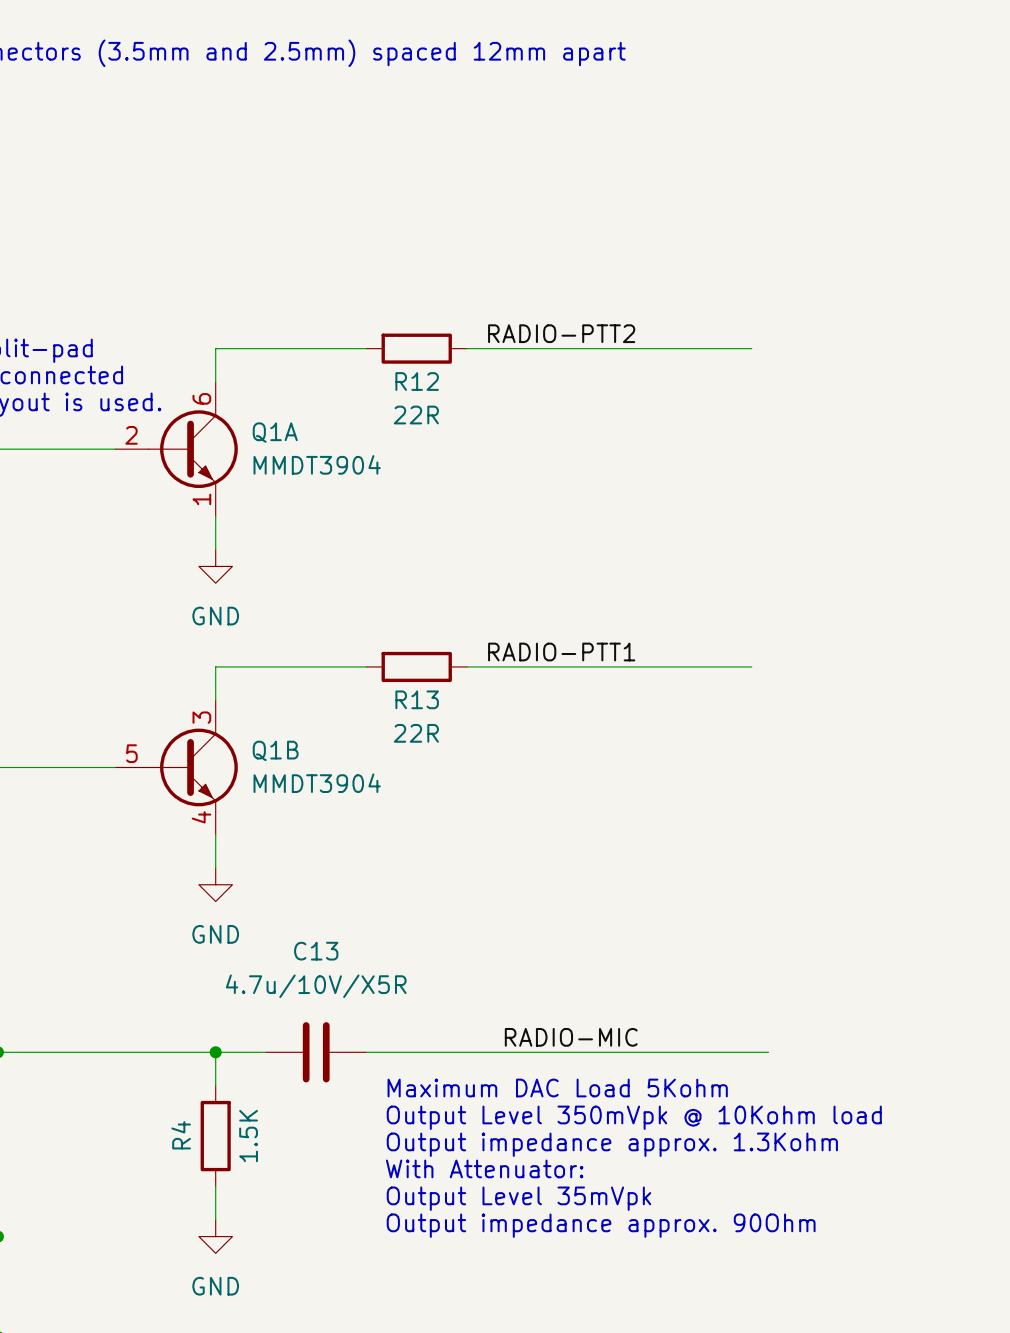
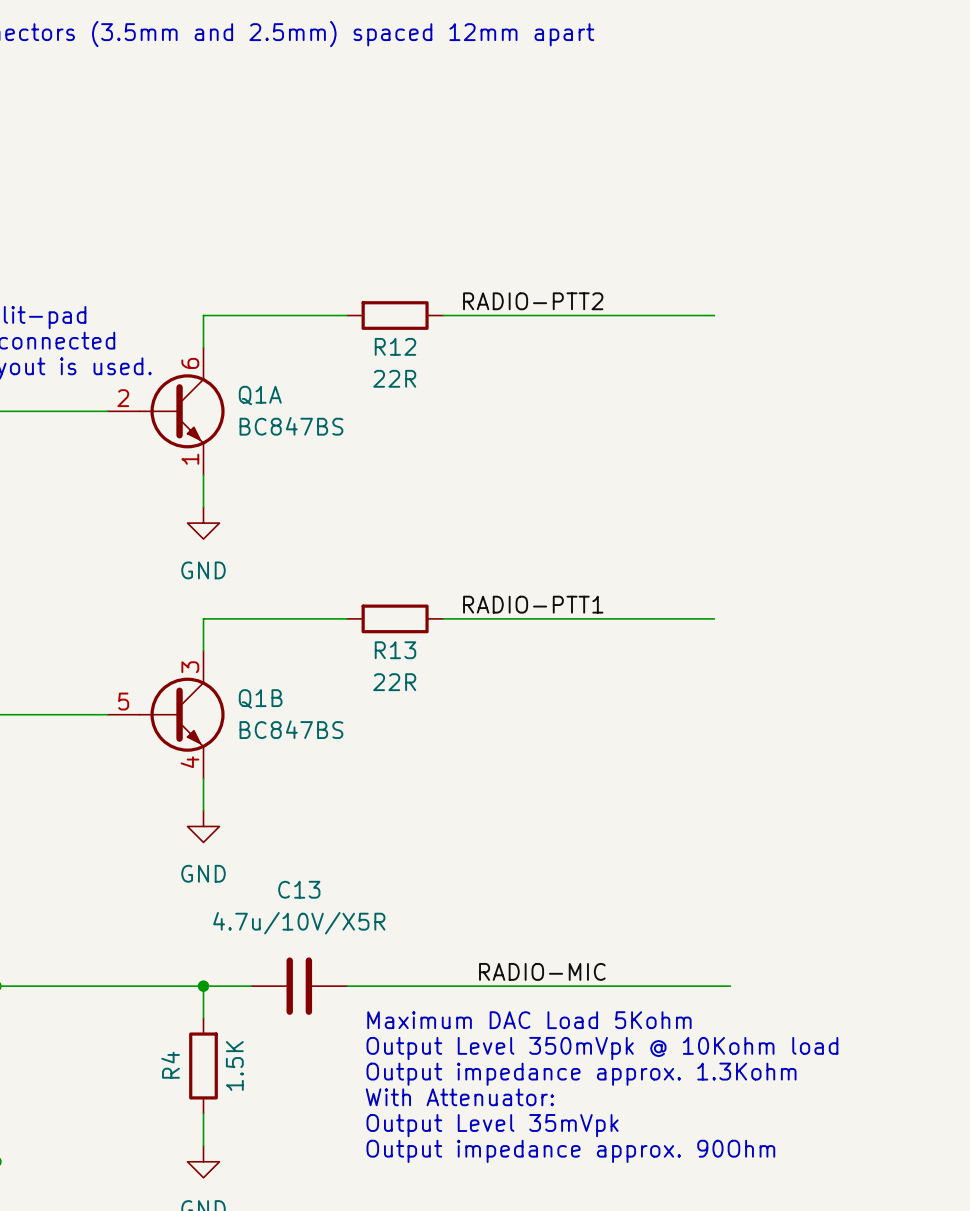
Q1A value: MMDT3904 (317, 464) -> BC847BS (291, 426)
Q1B value: MMDT3904 (317, 783) -> BC847BS (291, 729)

